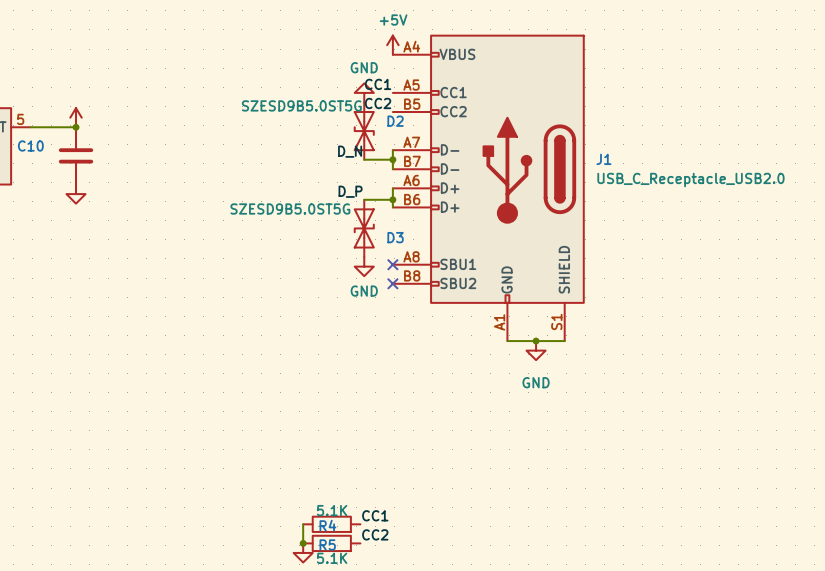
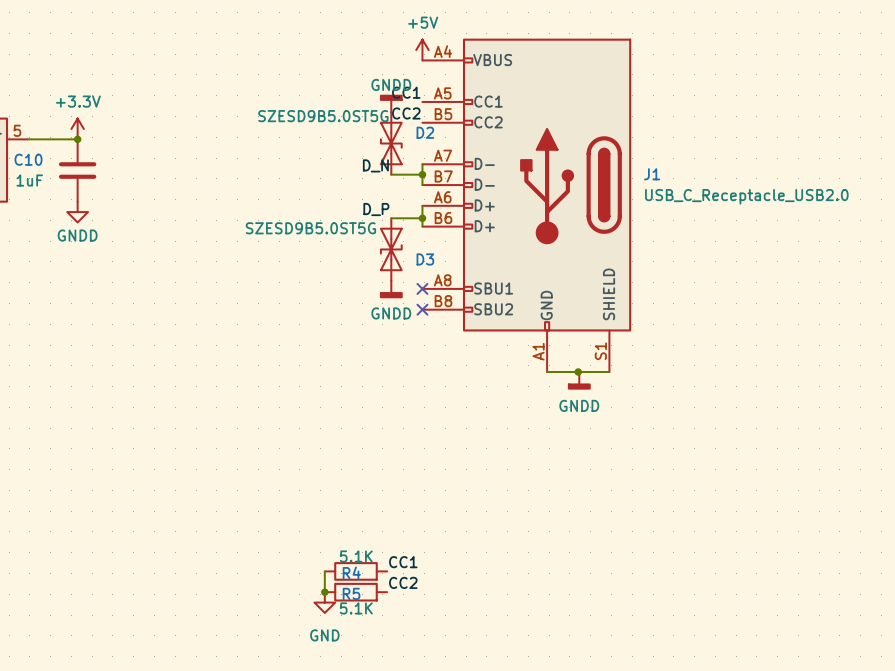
power symbol text: none -> +3.3V (78, 101)
power symbol: GND (364, 92) -> GNDD (391, 103)
C10 value: none -> 1uF (29, 180)
power symbol text: none -> GNDD (77, 235)
power symbol: GND (364, 266) -> GNDD (391, 289)
power symbol: GND (536, 350) -> GNDD (579, 380)

